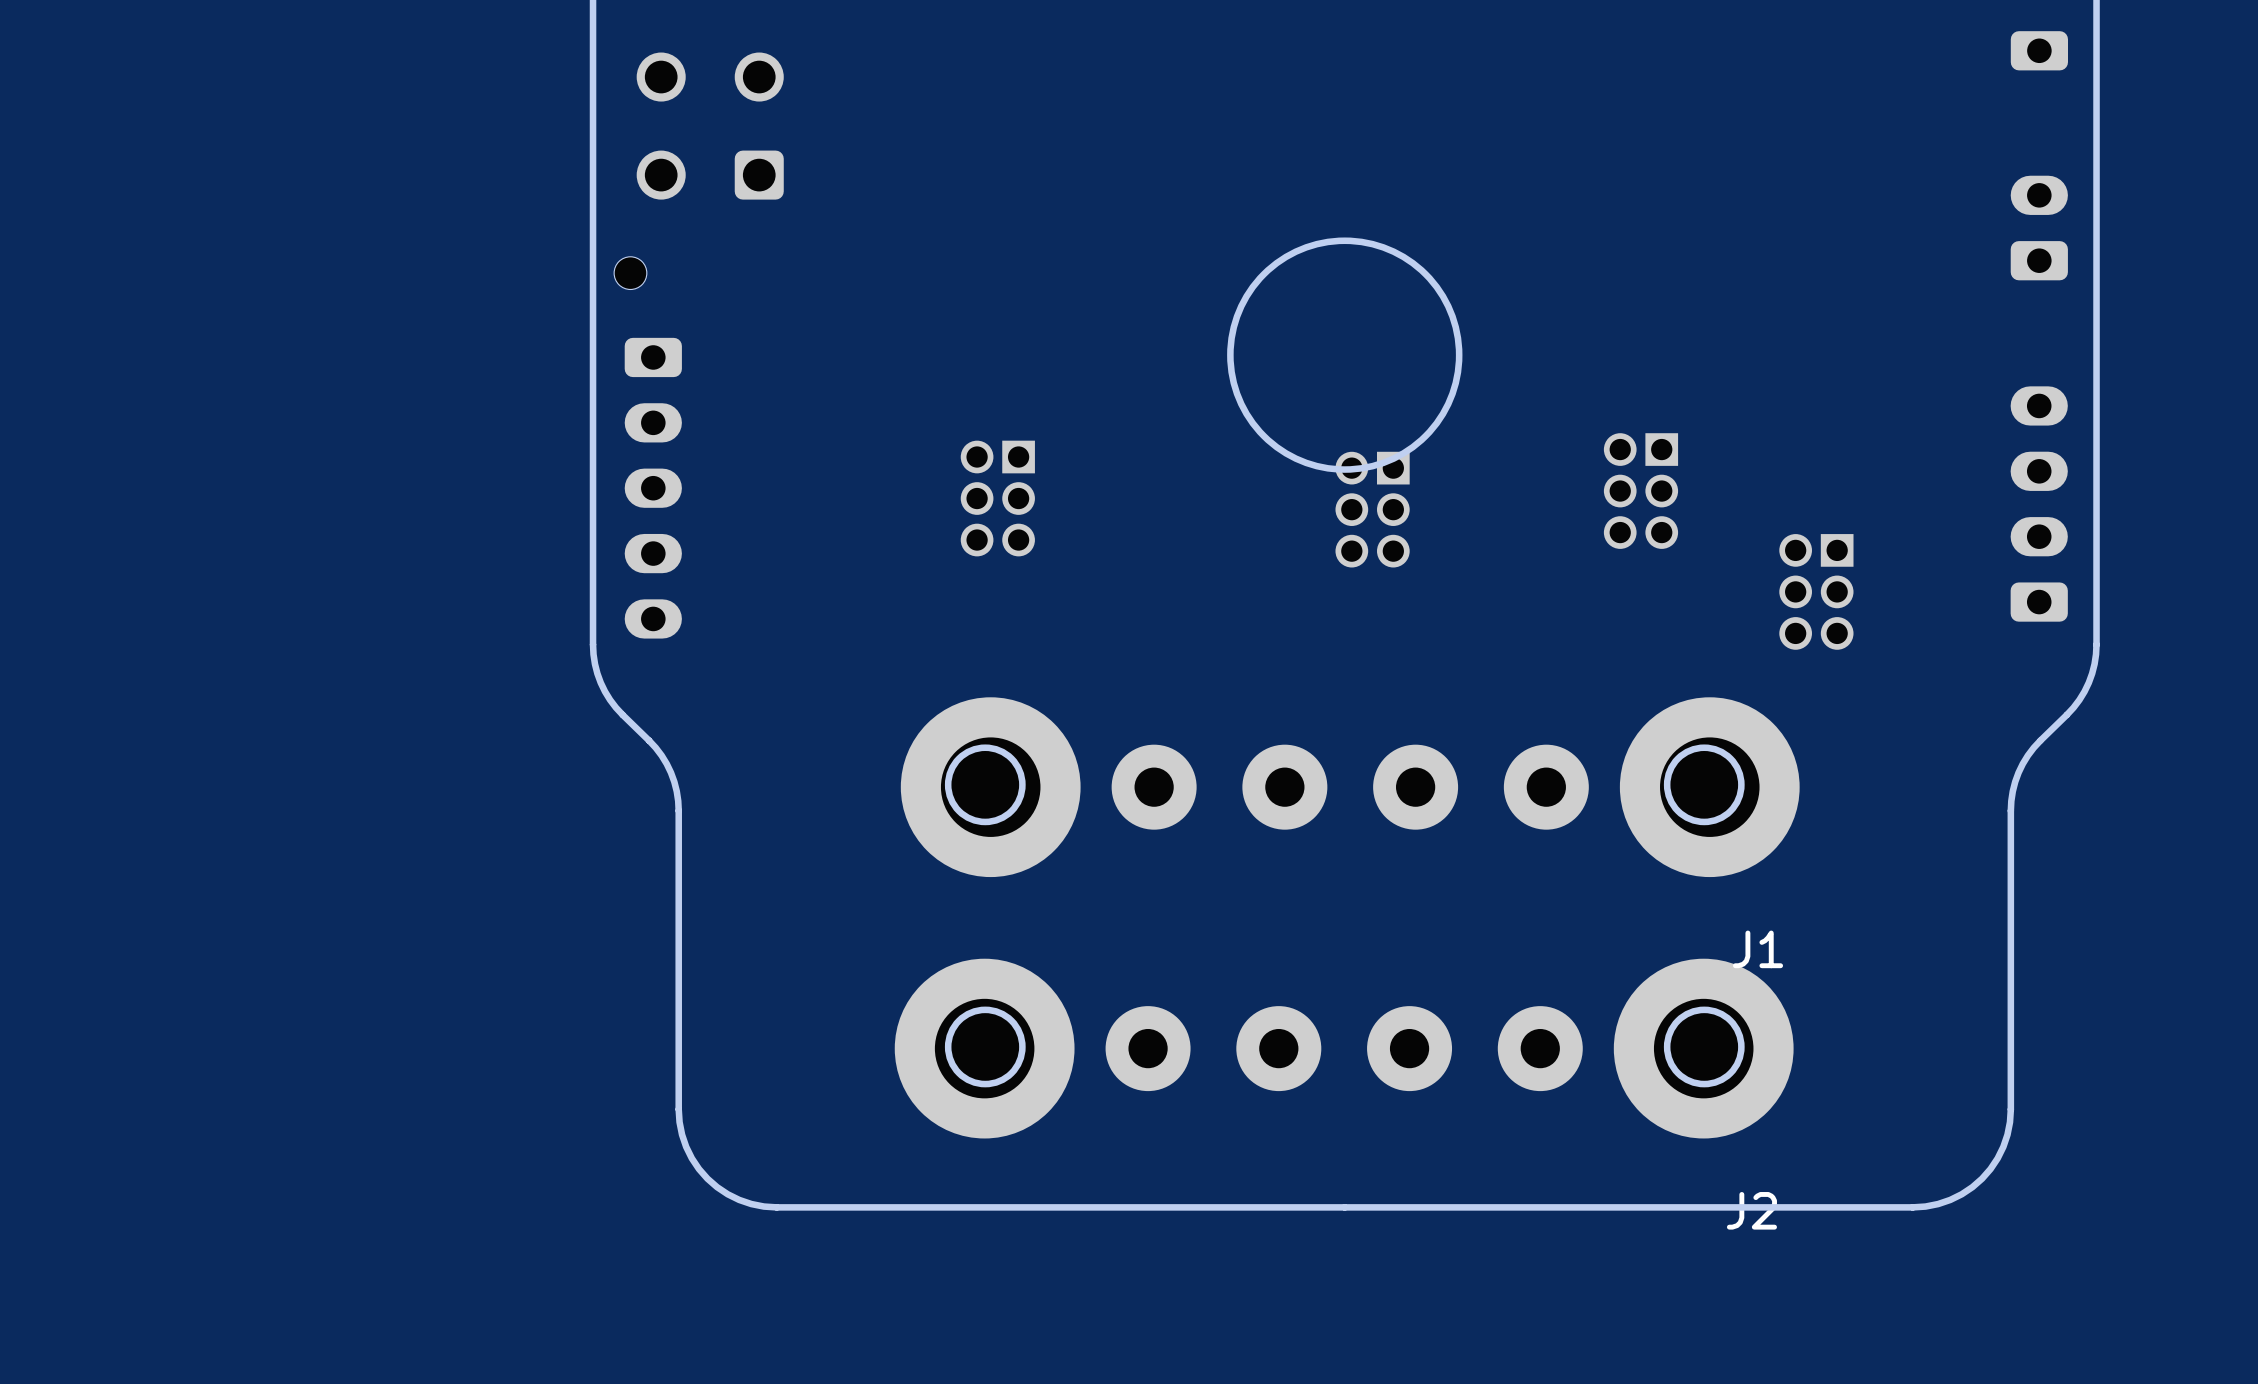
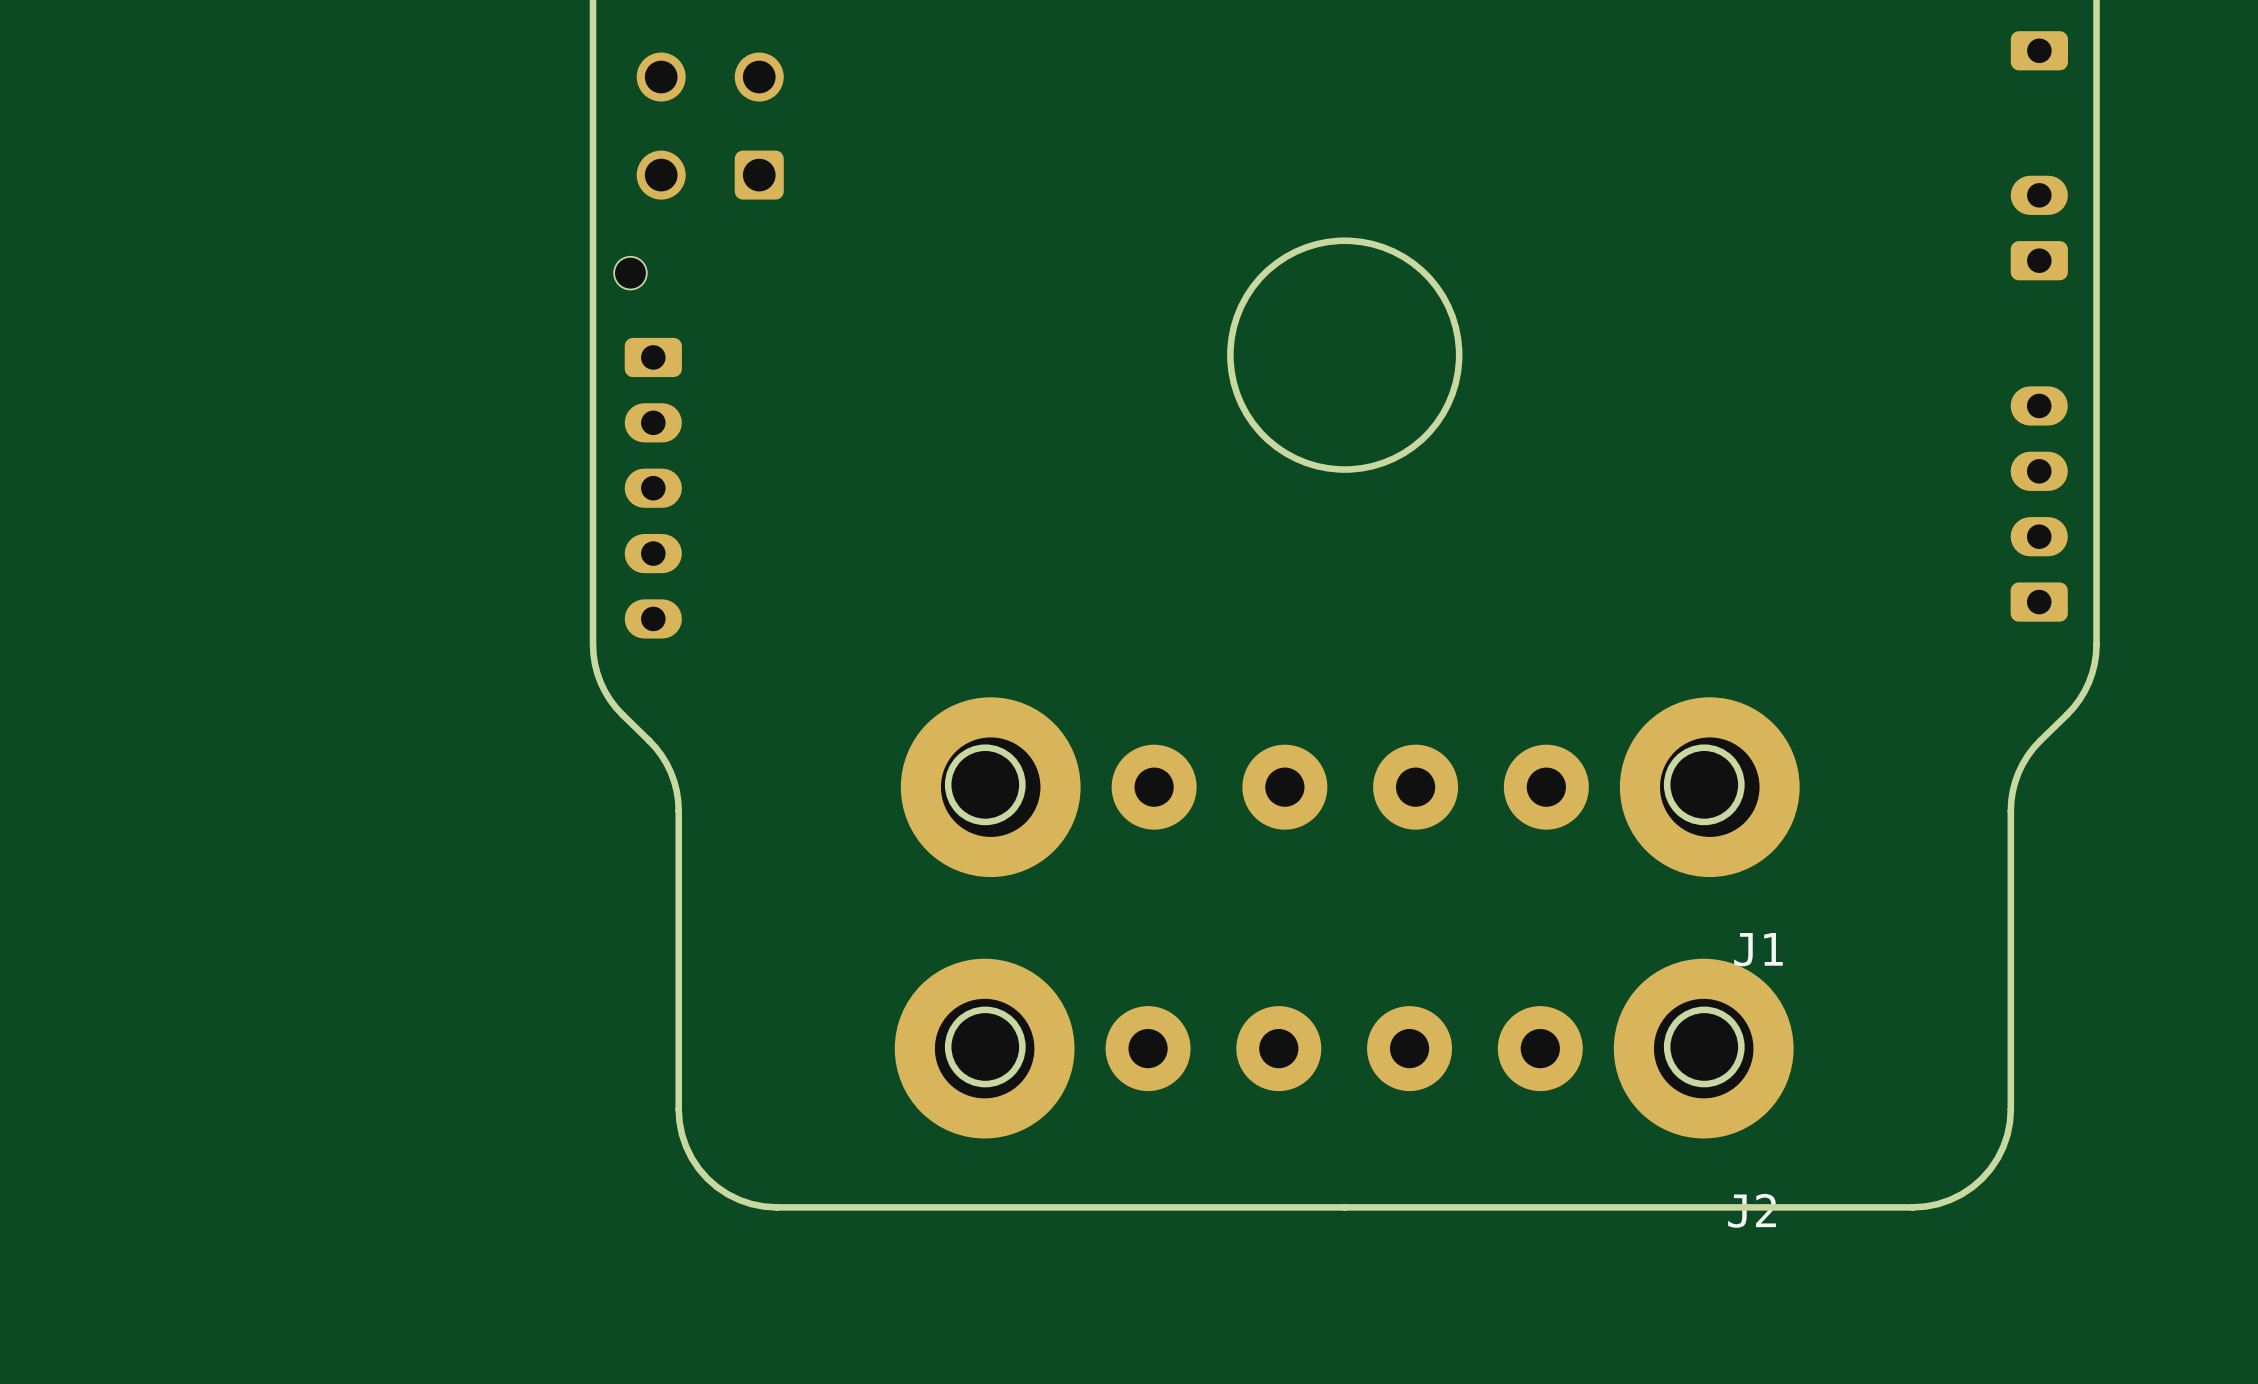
part: (1640, 491) -> none
part: (997, 498) -> none
part: (1372, 509) -> none
part: (1816, 591) -> none

